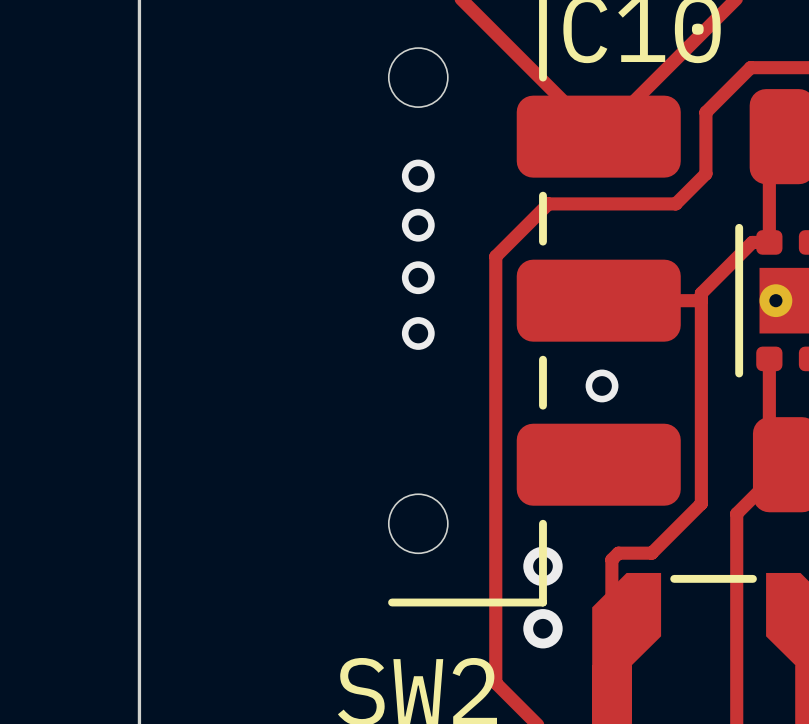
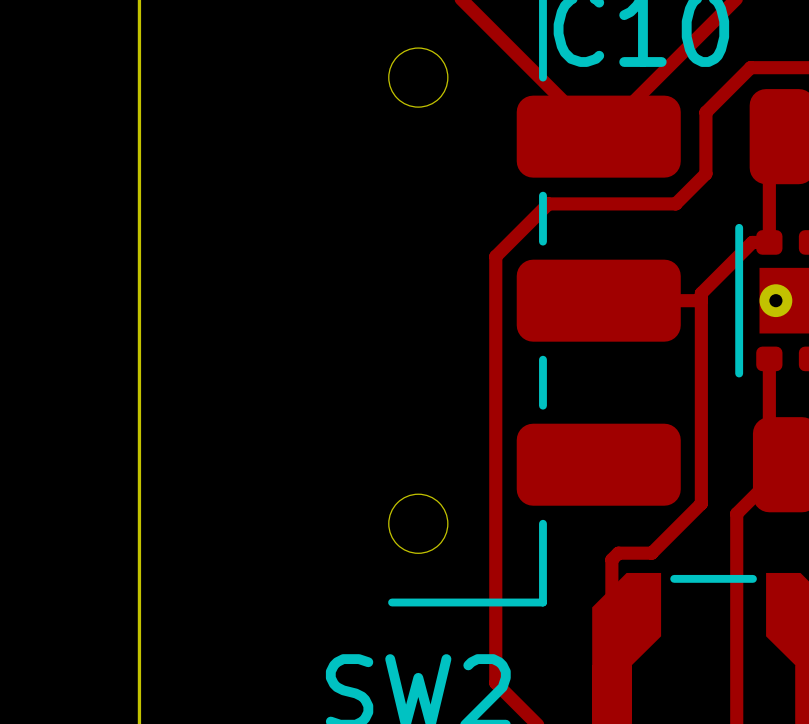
via: (418, 176) -> none
via: (418, 225) -> none
via: (418, 277) -> none
via: (418, 333) -> none
via: (602, 385) -> none
via: (542, 566) -> none
via: (542, 628) -> none

